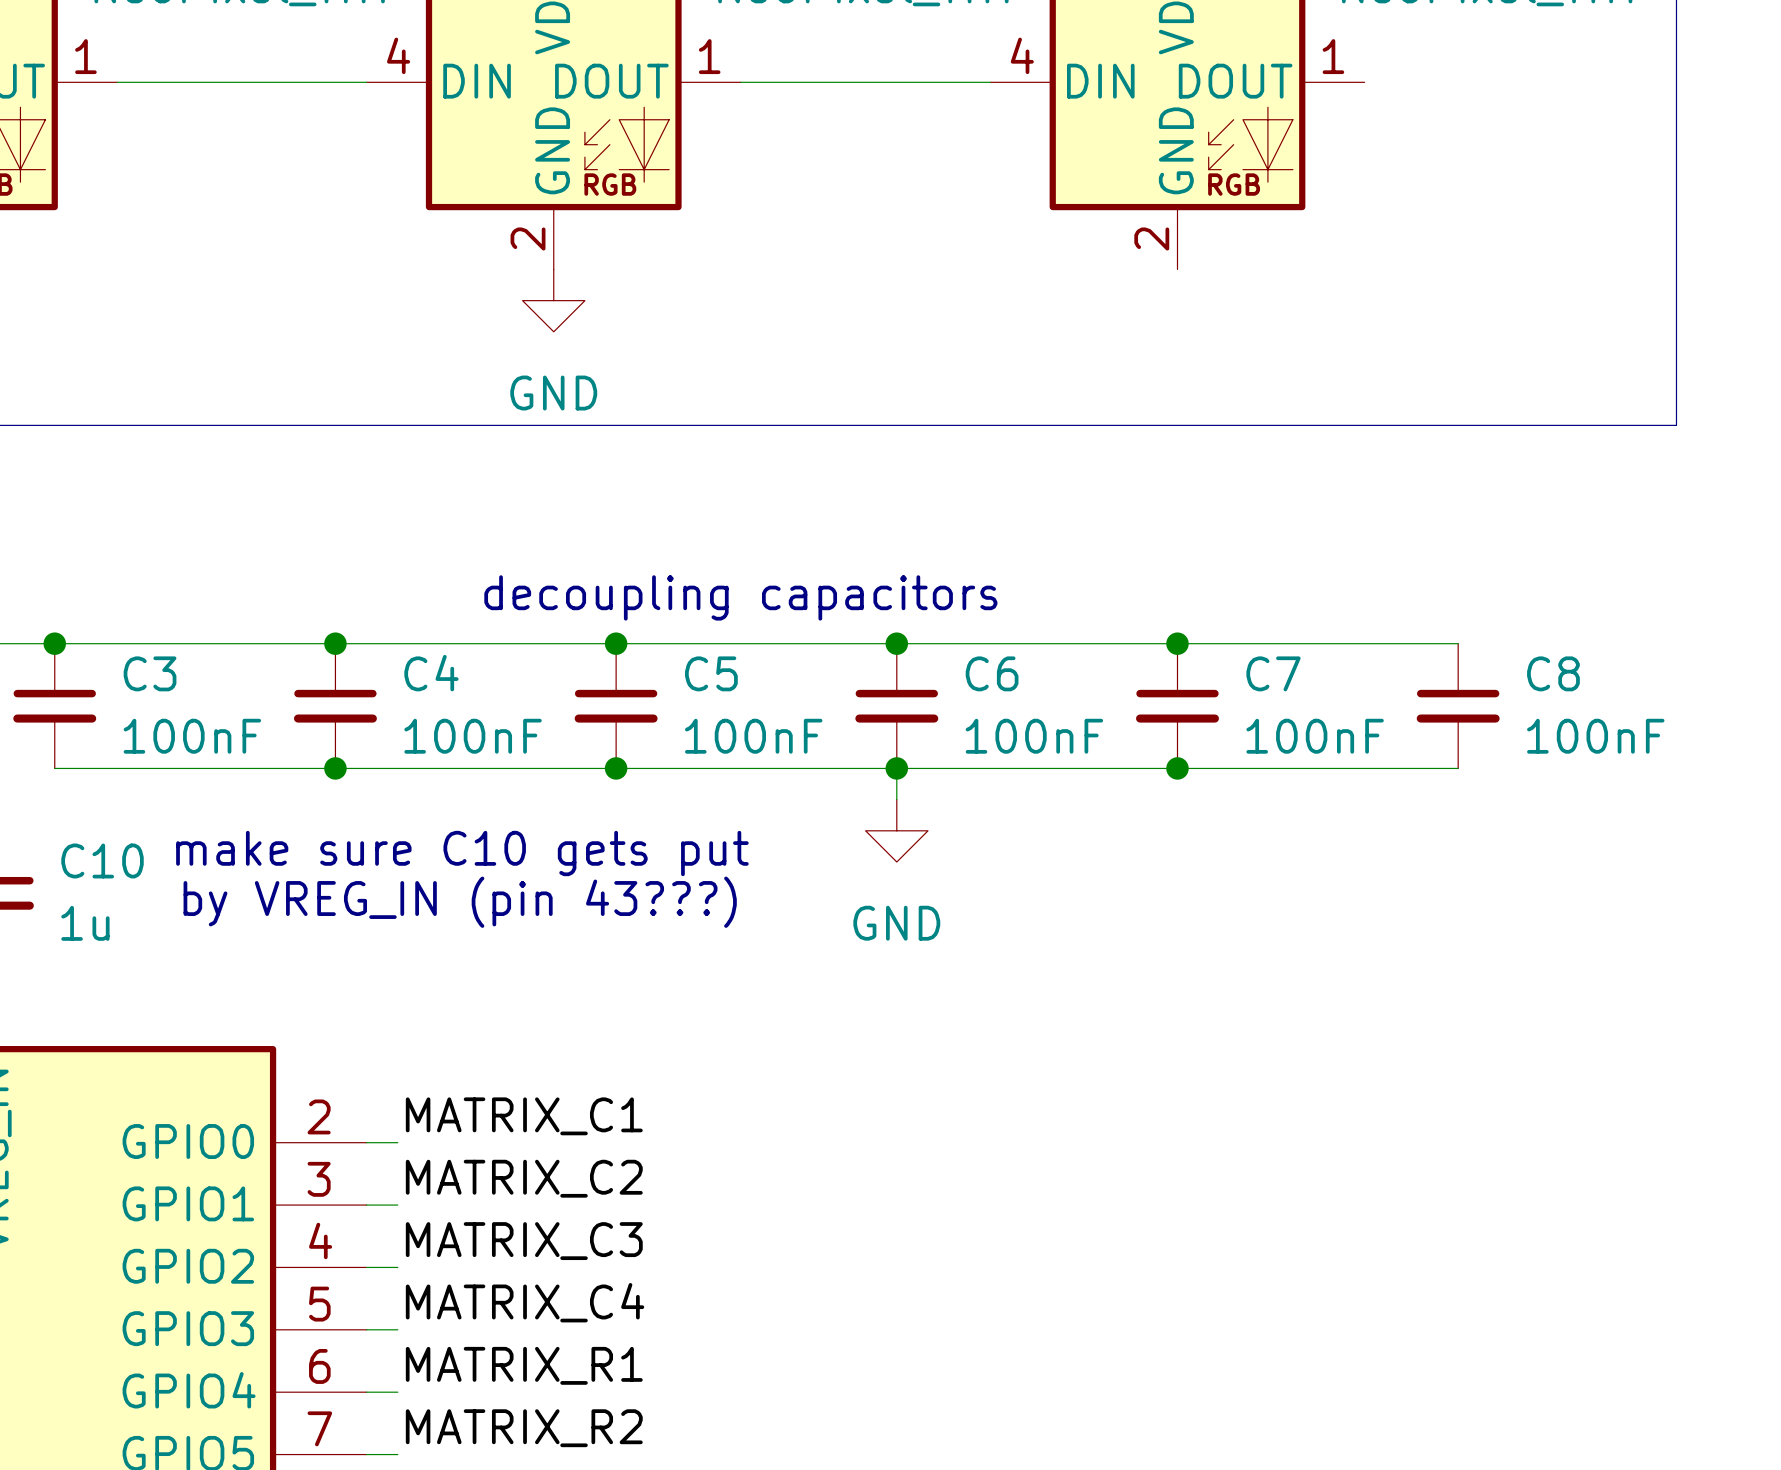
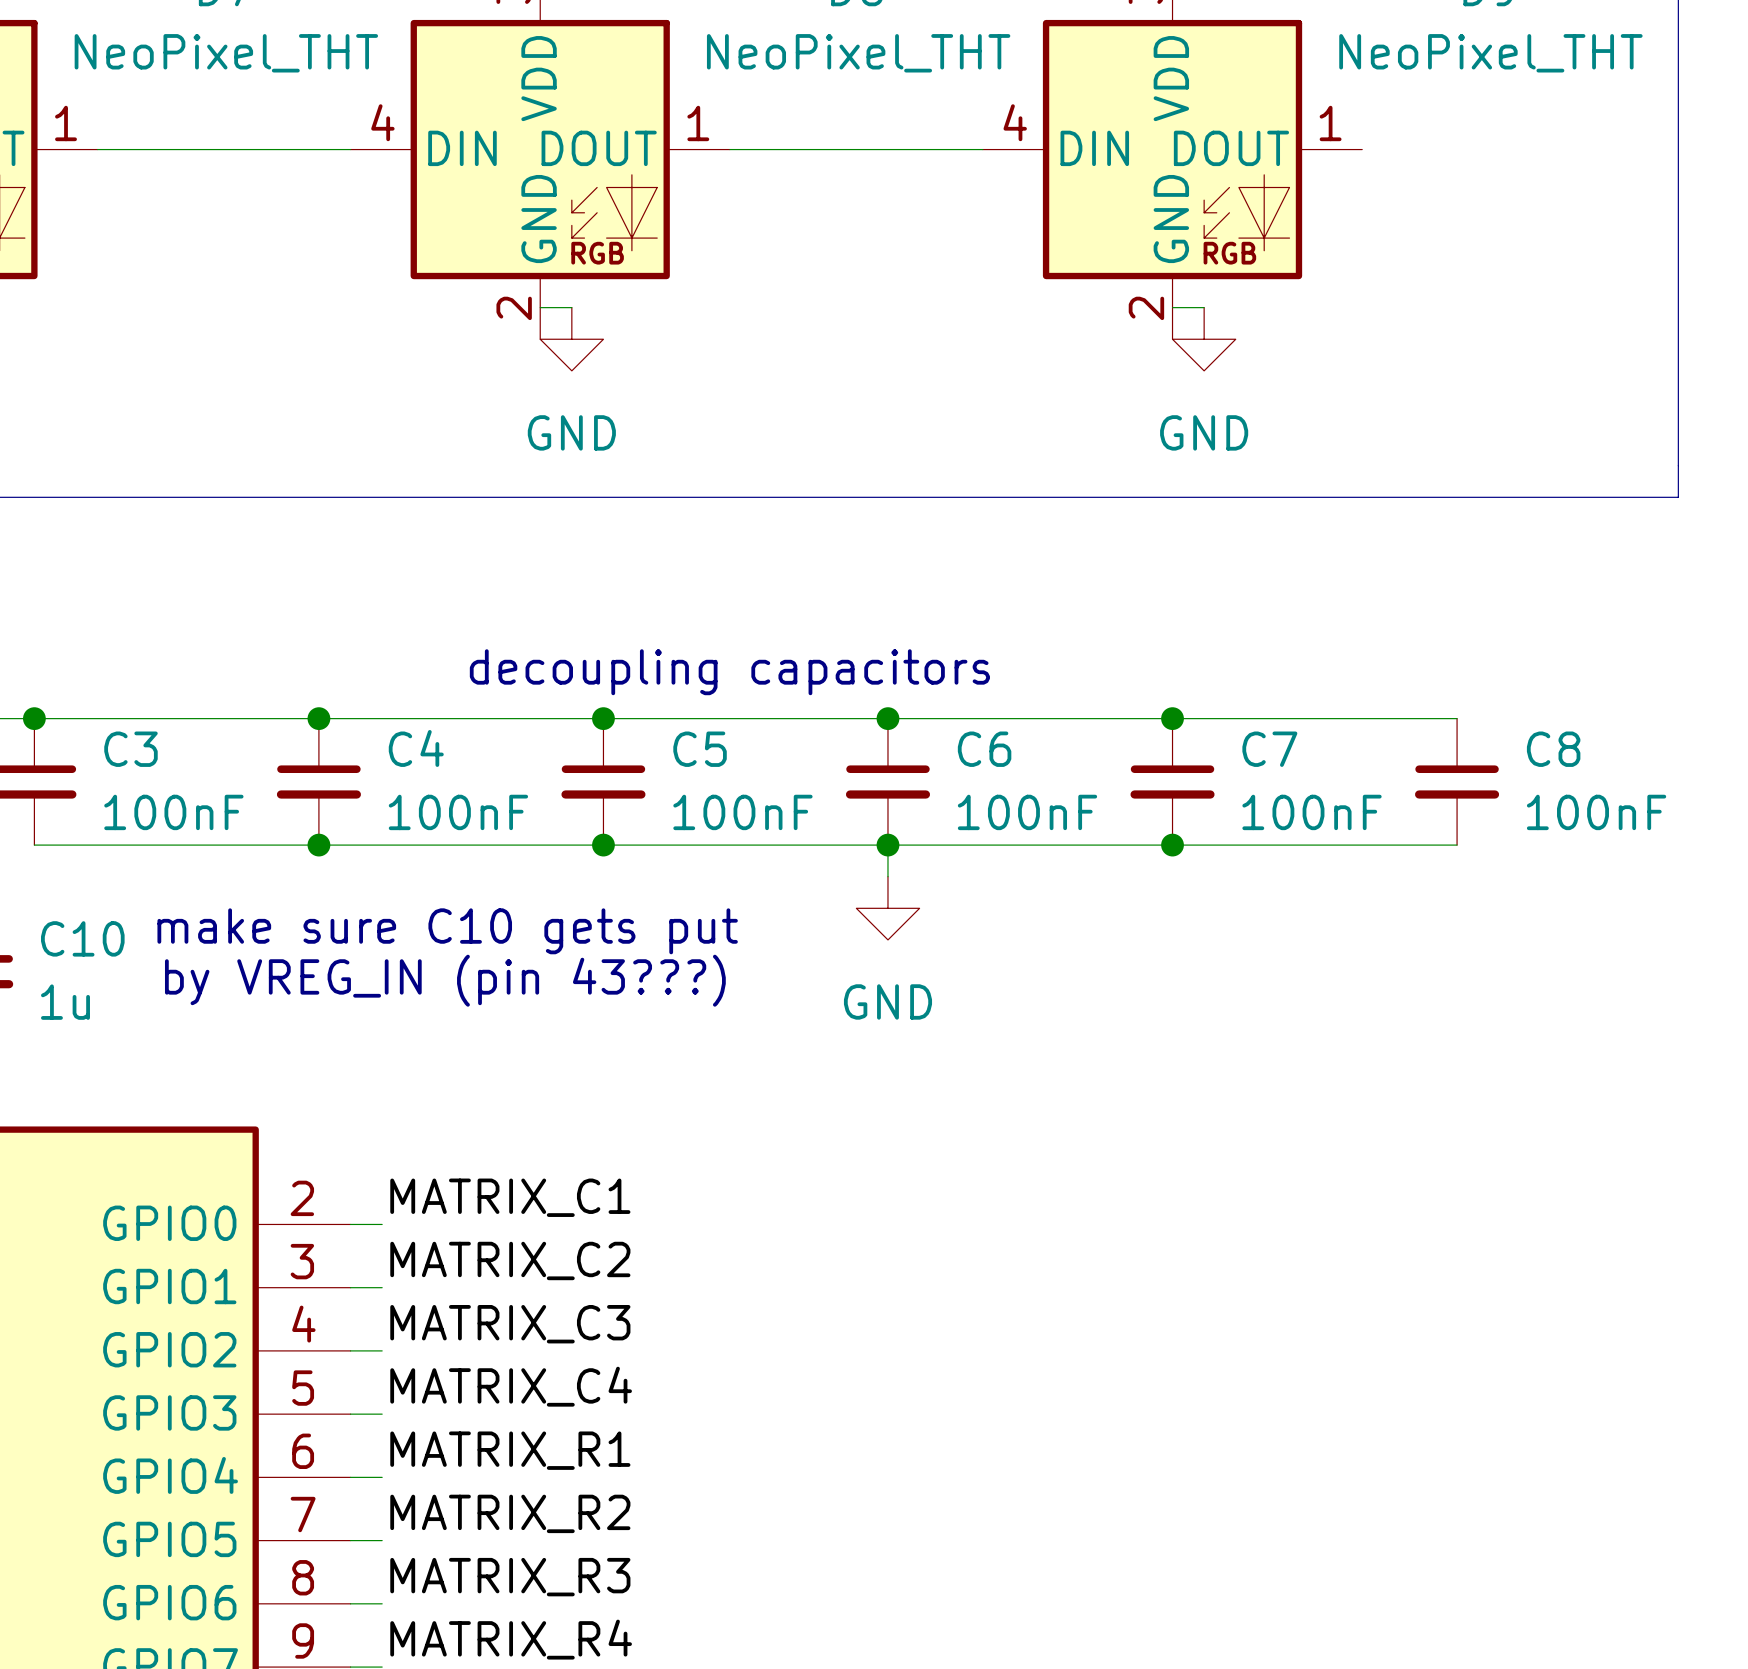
wire: none -> (540, 307) (571, 307)
wire: none -> (1172, 307) (1204, 307)
power symbol: none -> GND (1204, 339)
power symbol position: GND (553, 300) -> GND (571, 339)

